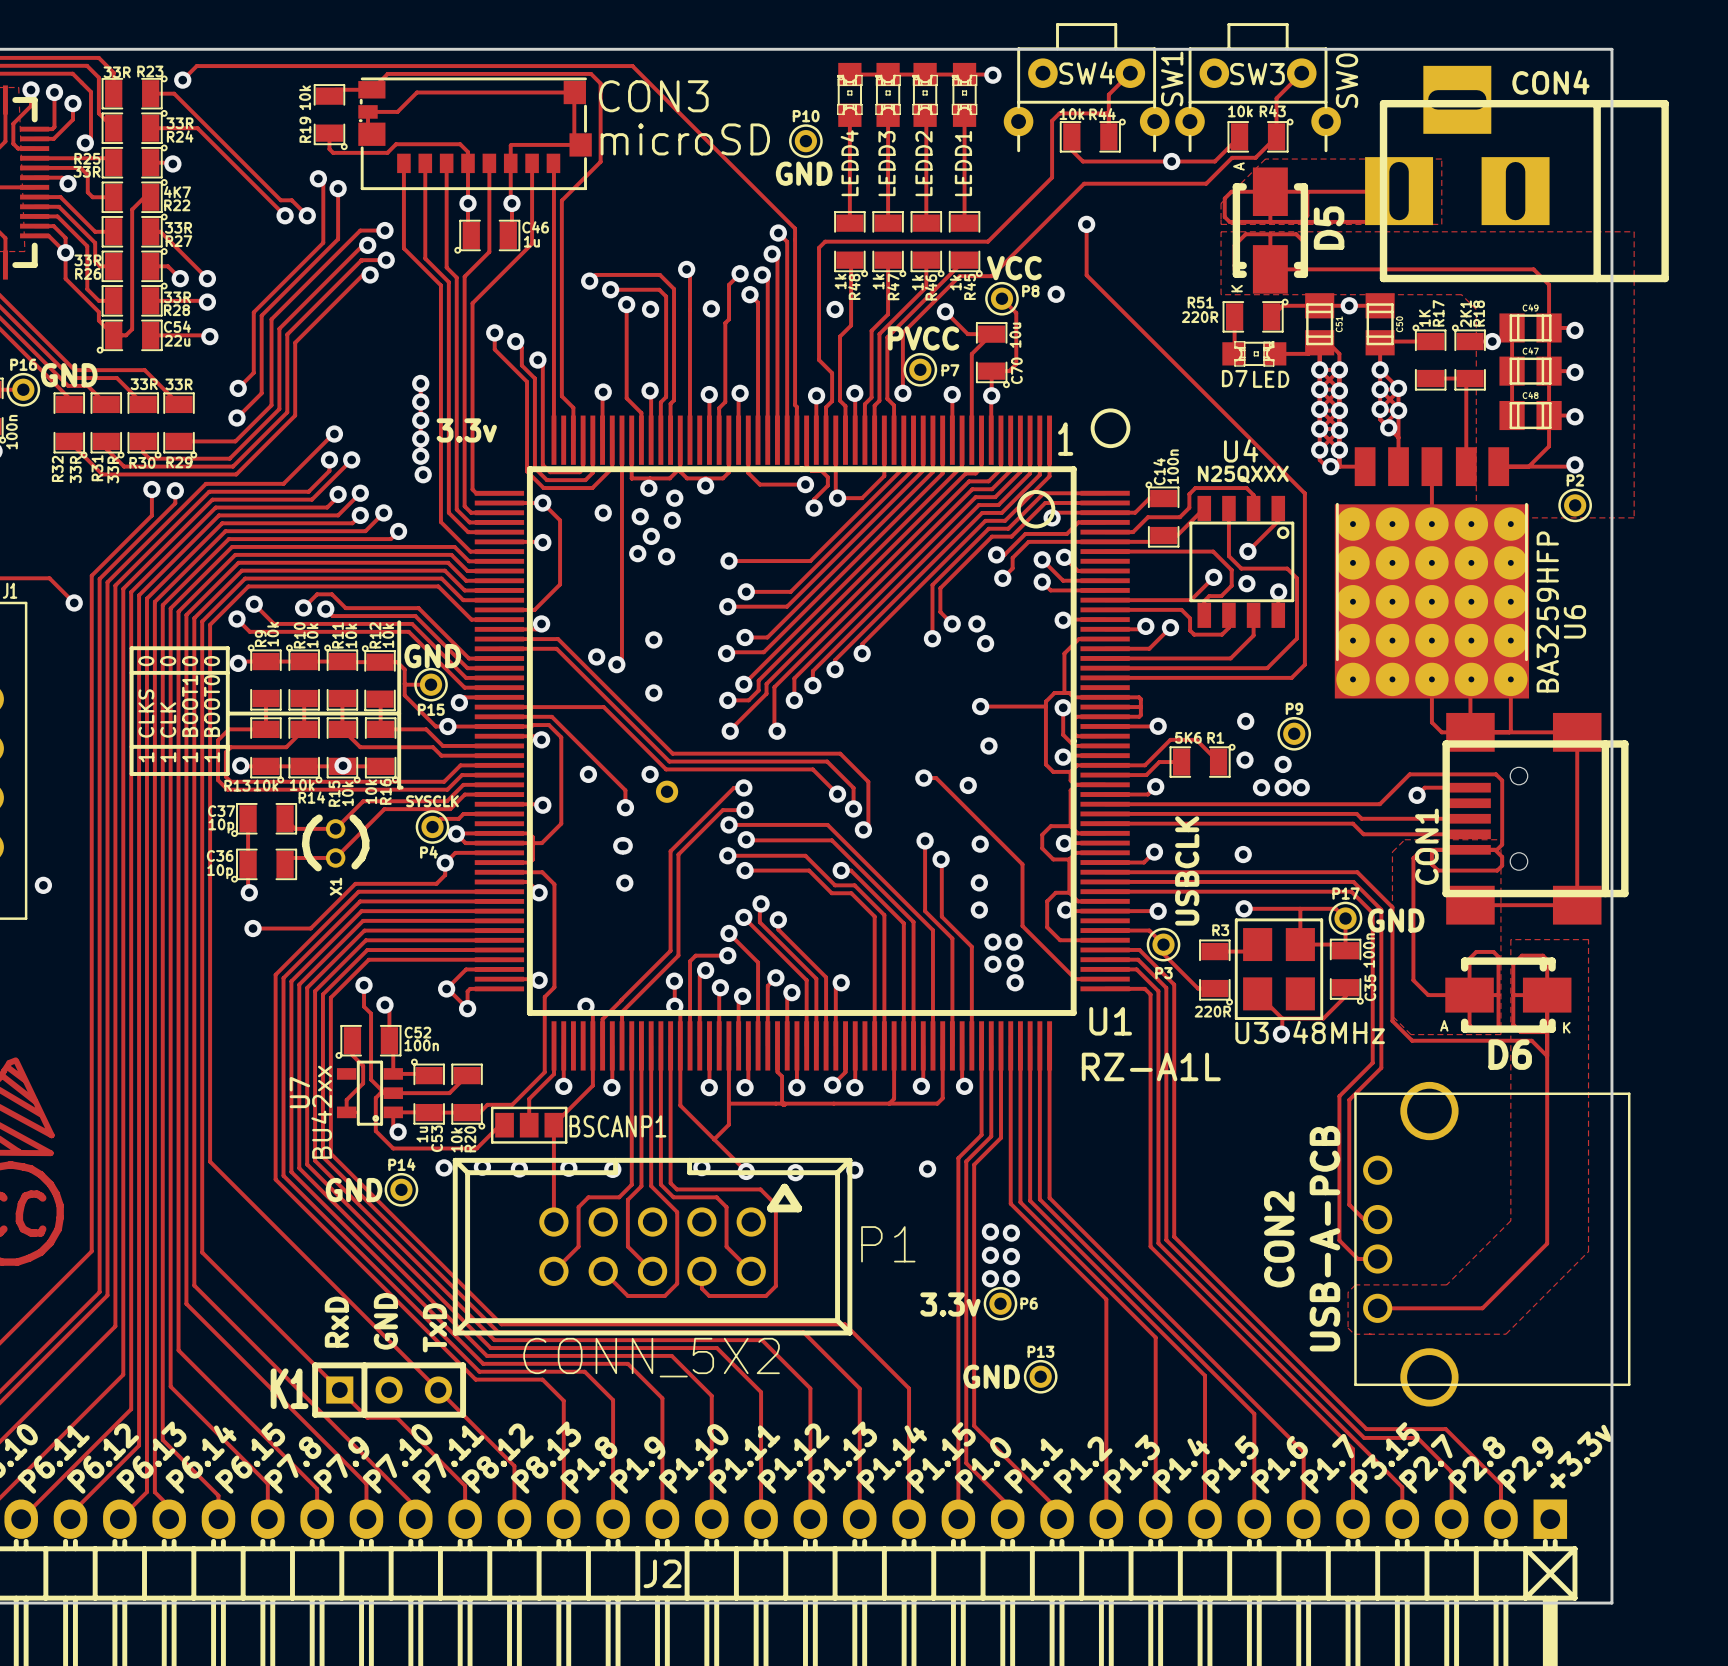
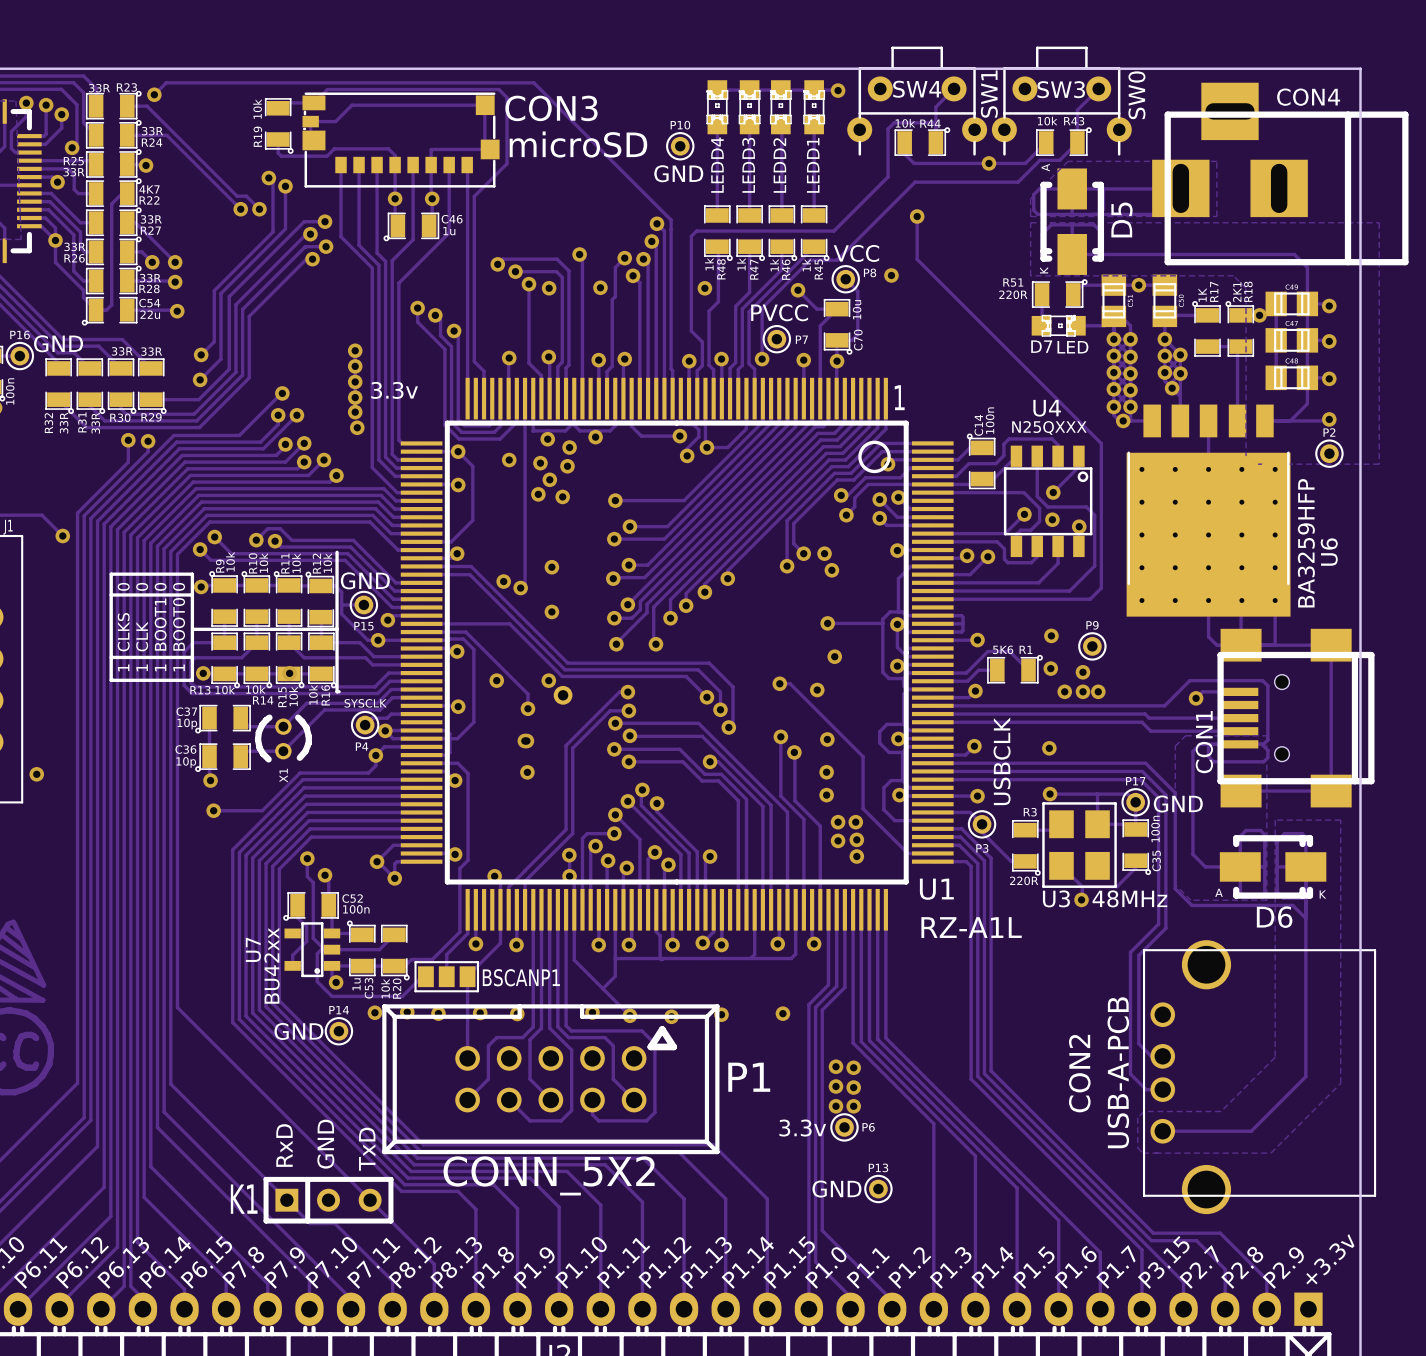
drawing: [1090, 408, 1131, 449] -> none

